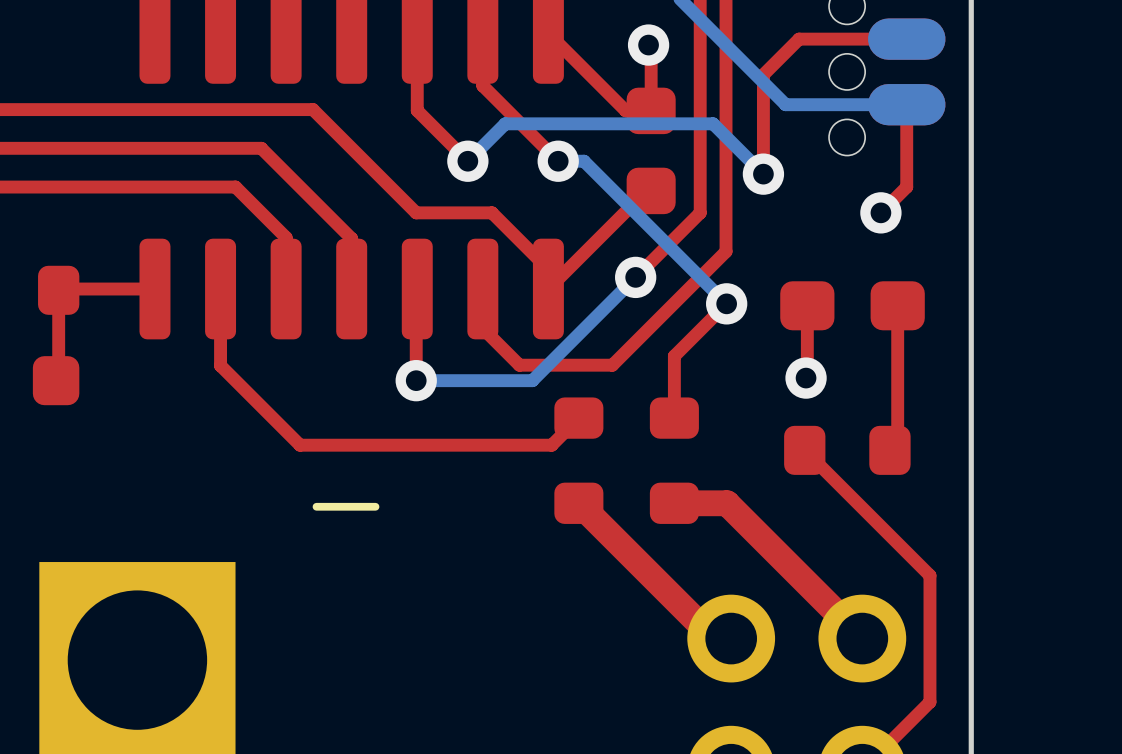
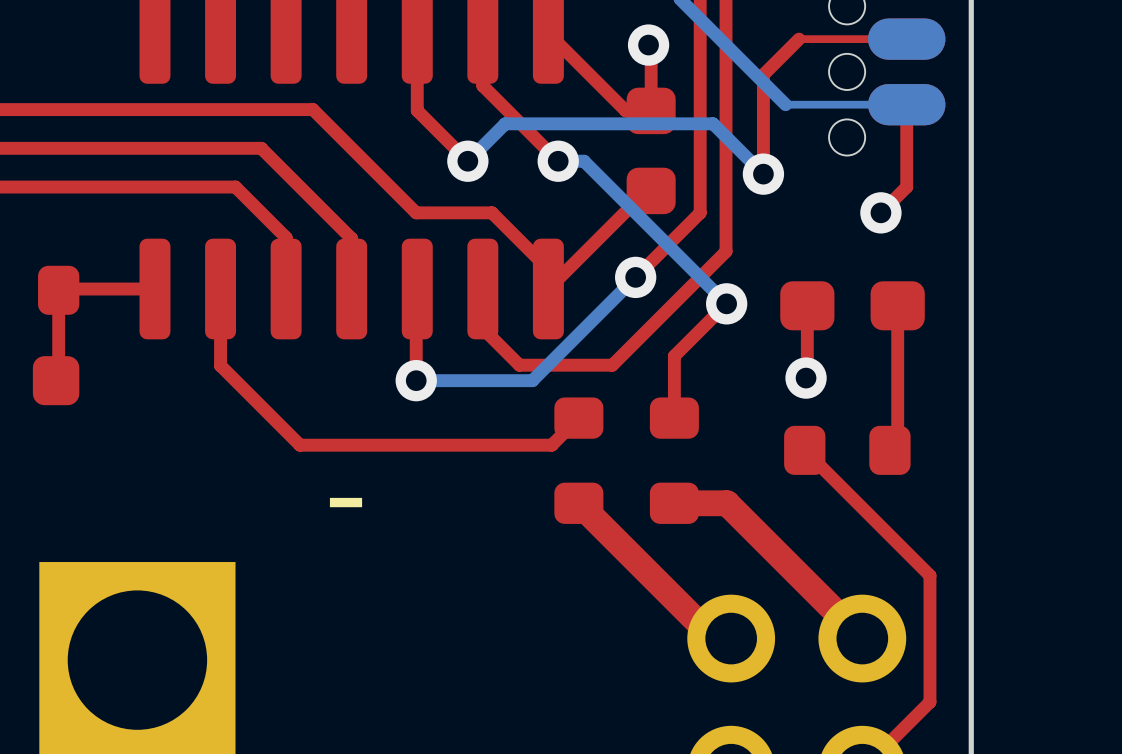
top track width: thick (906, 39) (799, 39) -> thin (906, 39) (799, 39)
bottom track width: thick (906, 104) (785, 104) -> thin (906, 104) (785, 104)

